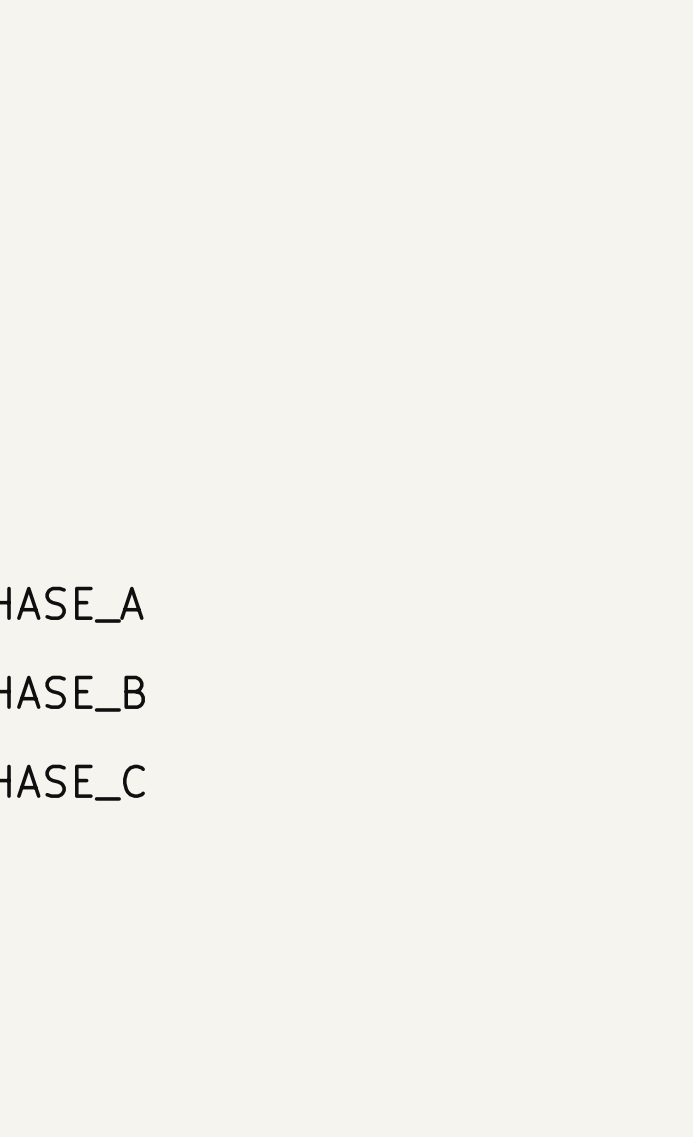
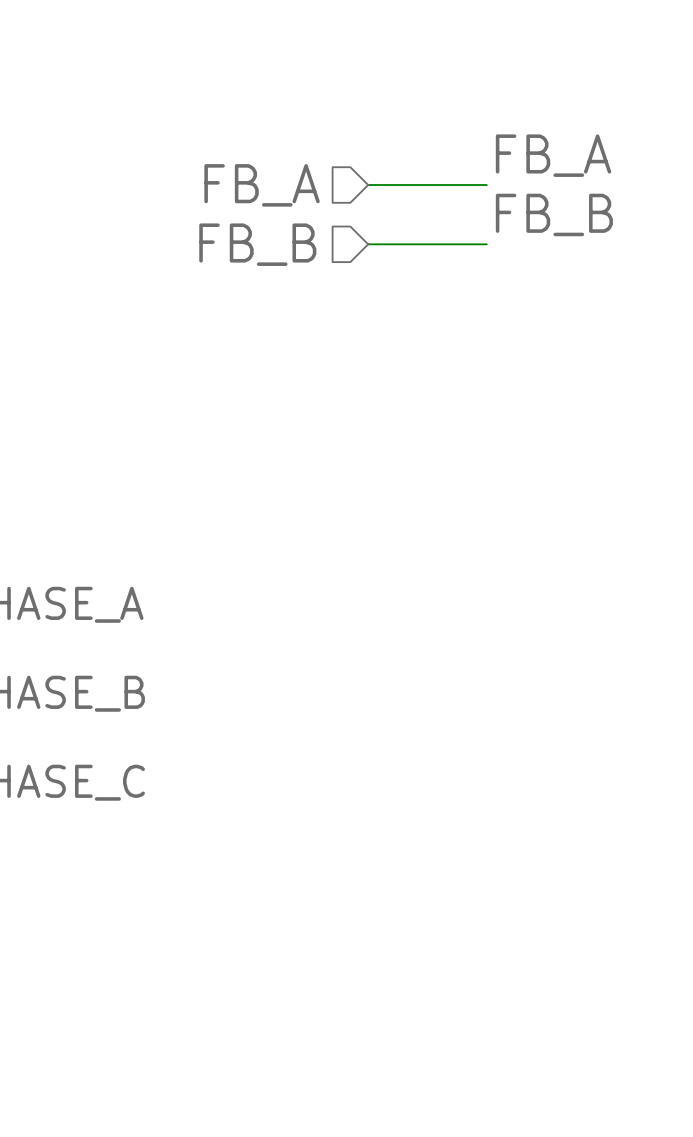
label: none -> FB_A (553, 155)
sheet pin: none -> FB_A (262, 185)
wire: none -> (368, 185) (486, 185)
label: none -> FB_B (554, 214)
sheet pin: none -> FB_B (257, 244)
wire: none -> (368, 244) (486, 244)

